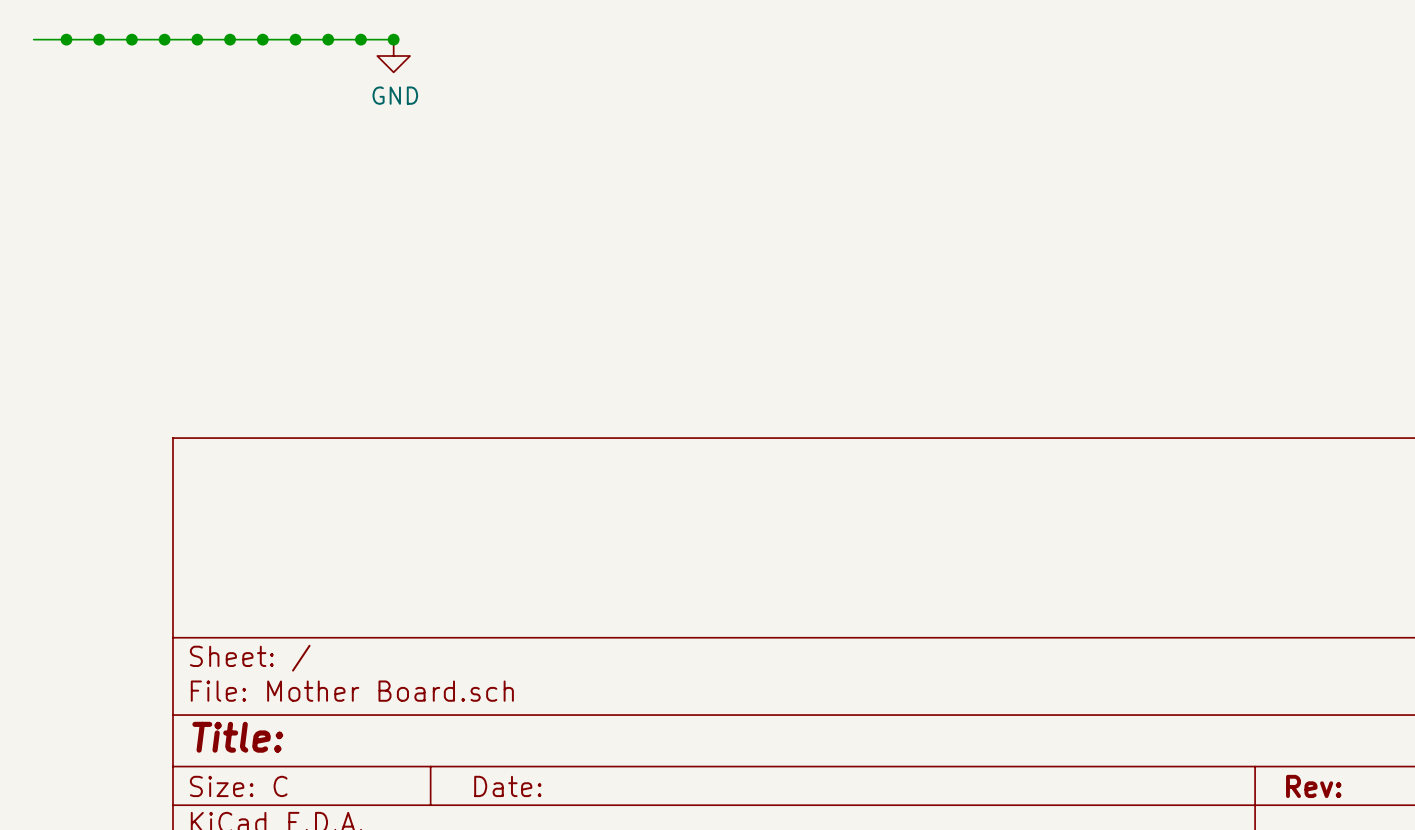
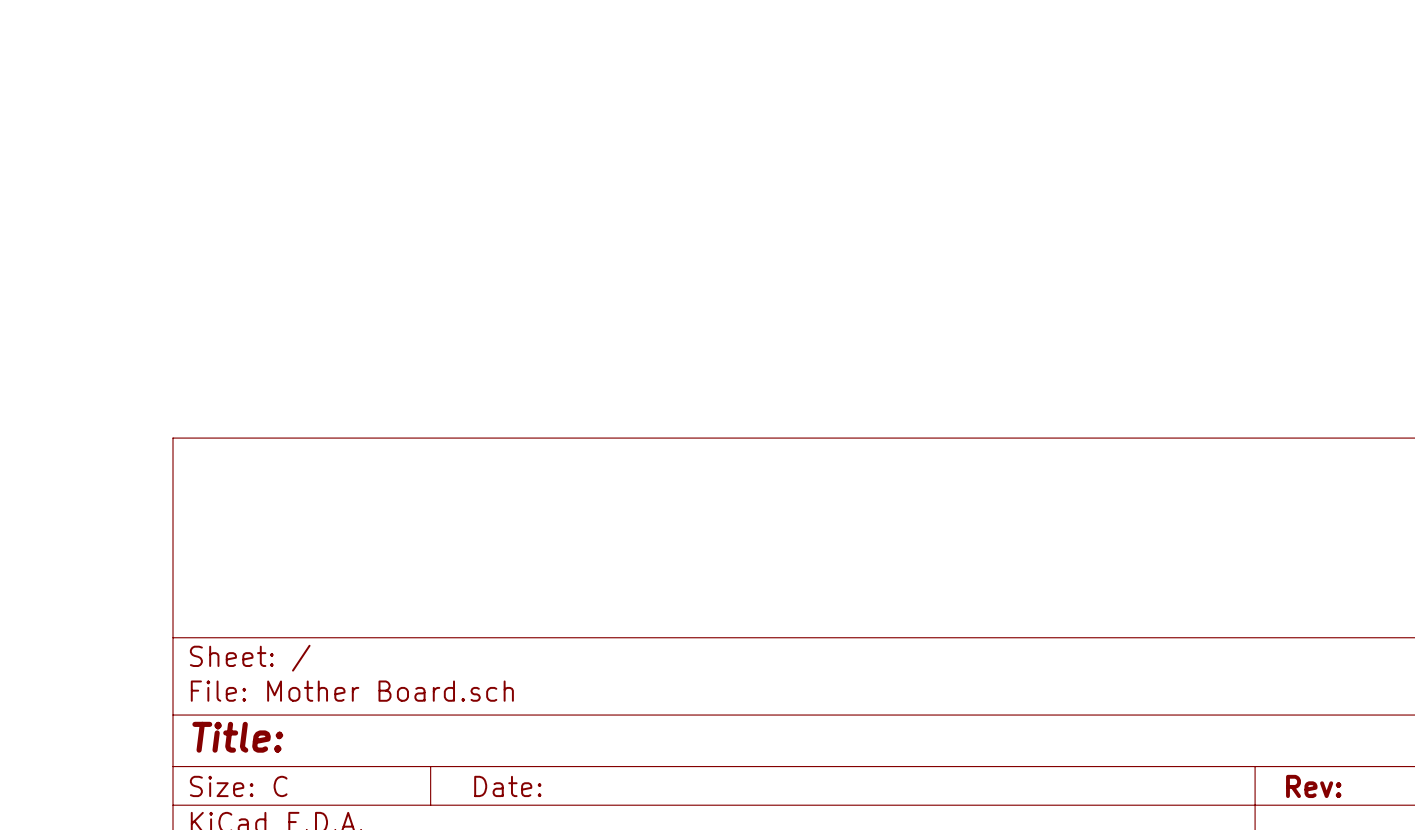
wire: (33, 39) (393, 39) -> none
junction: (66, 39) -> none
junction: (99, 39) -> none
junction: (131, 39) -> none
junction: (164, 39) -> none
junction: (197, 39) -> none
junction: (230, 39) -> none
junction: (262, 39) -> none
junction: (295, 39) -> none
junction: (328, 39) -> none
junction: (360, 39) -> none
junction: (393, 39) -> none
power symbol: GND (393, 56) -> none

